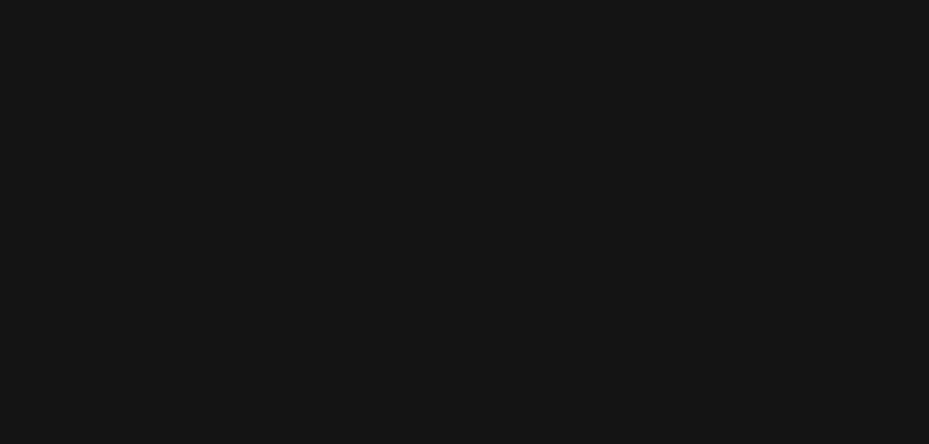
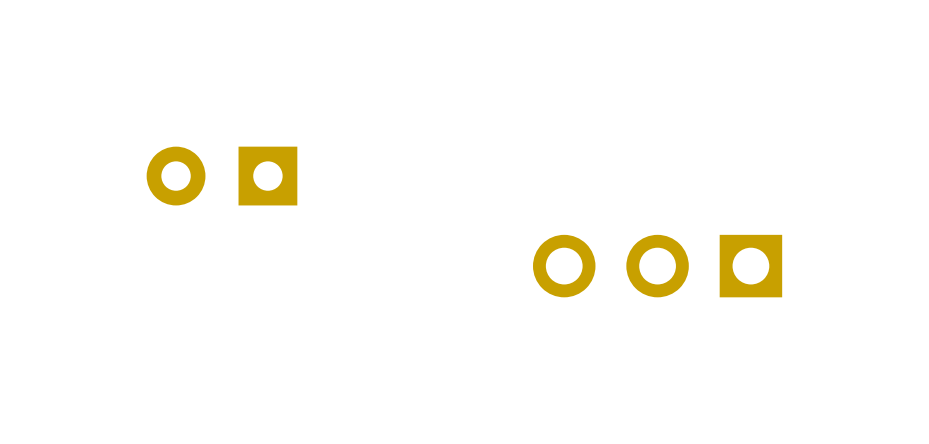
part: none -> (221, 176)
part: none -> (657, 266)

